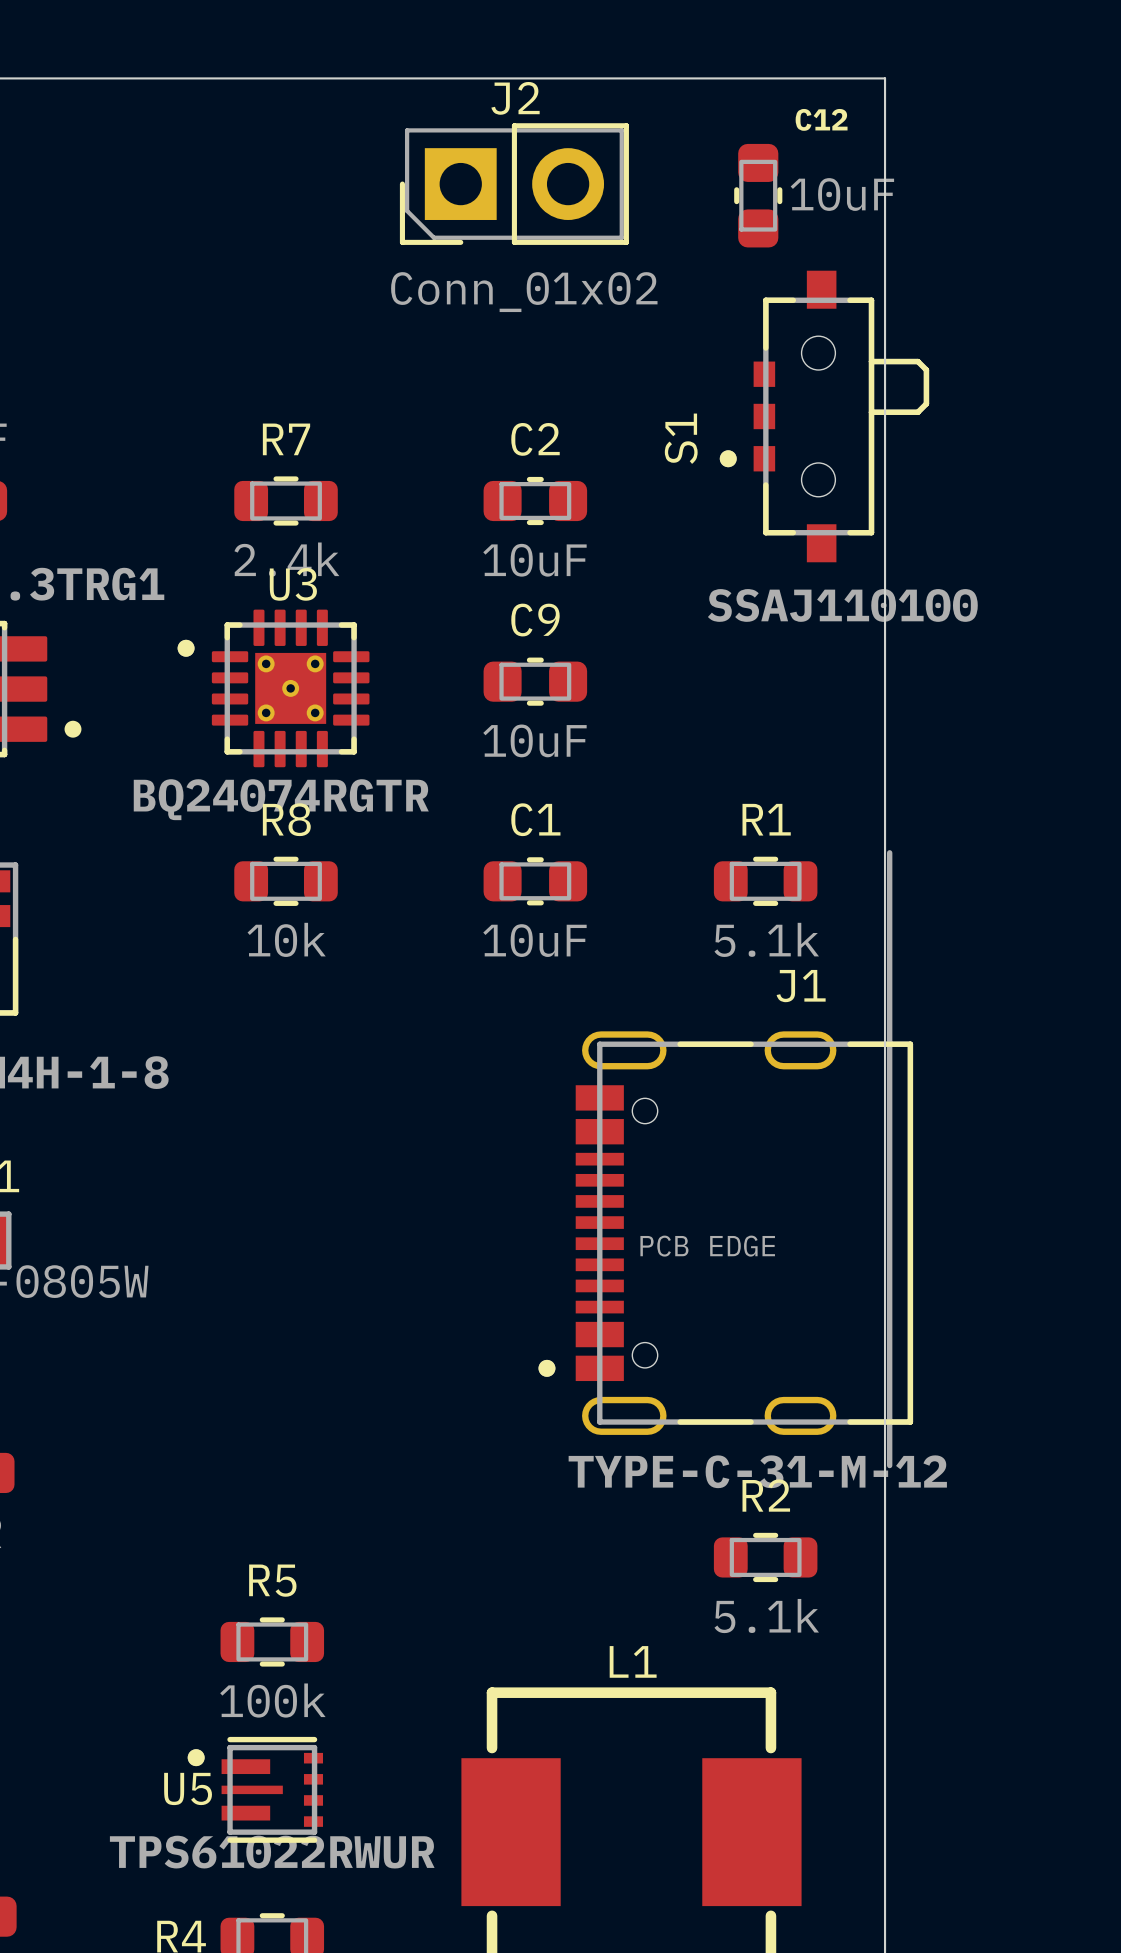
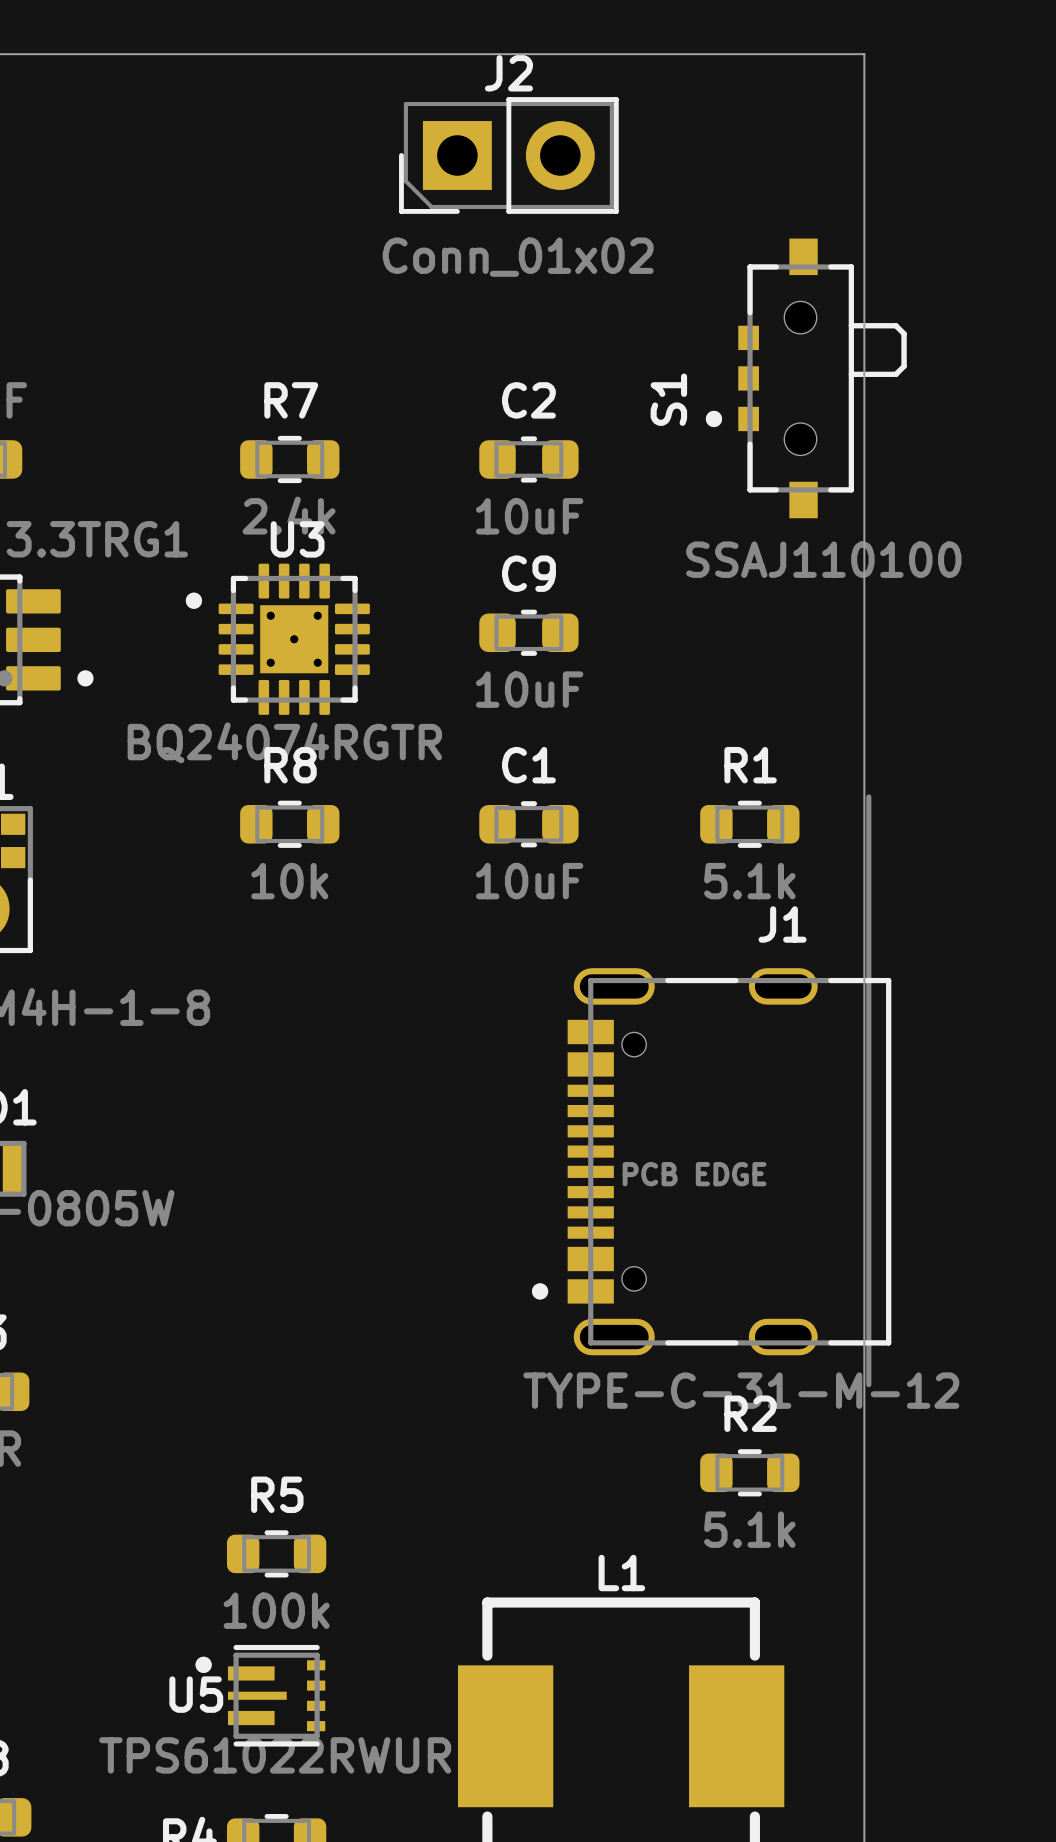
C12: 10uF (758, 195) -> none

